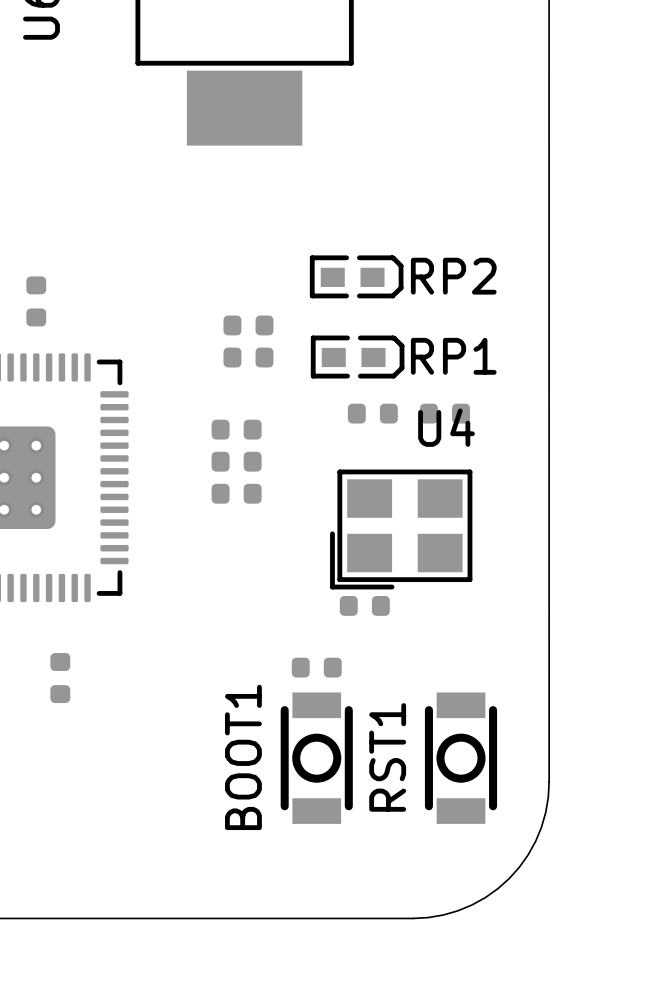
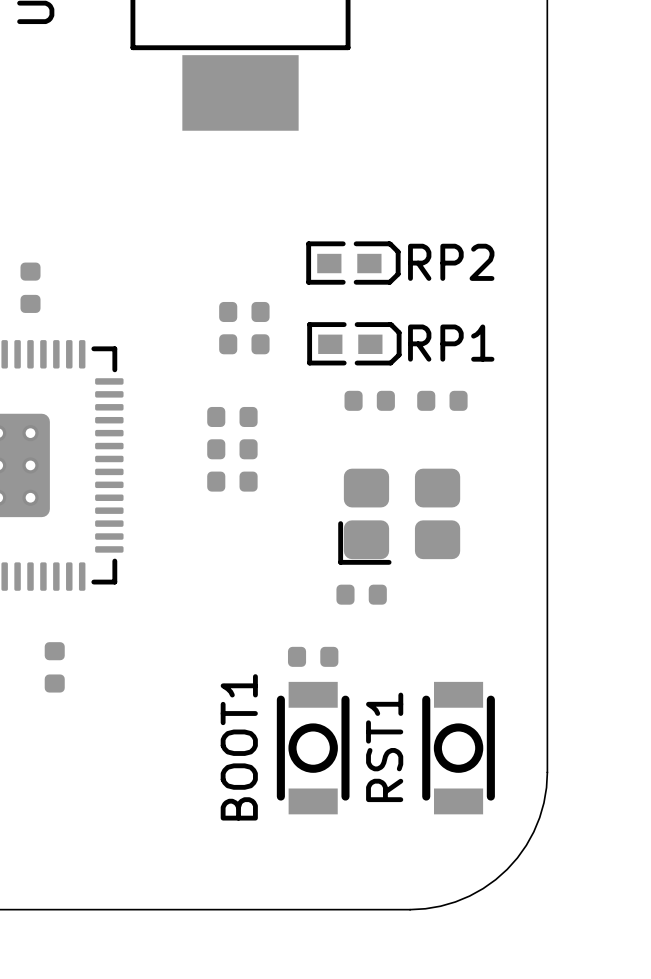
part: none -> (399, 516)
U4: (401, 529) -> none

